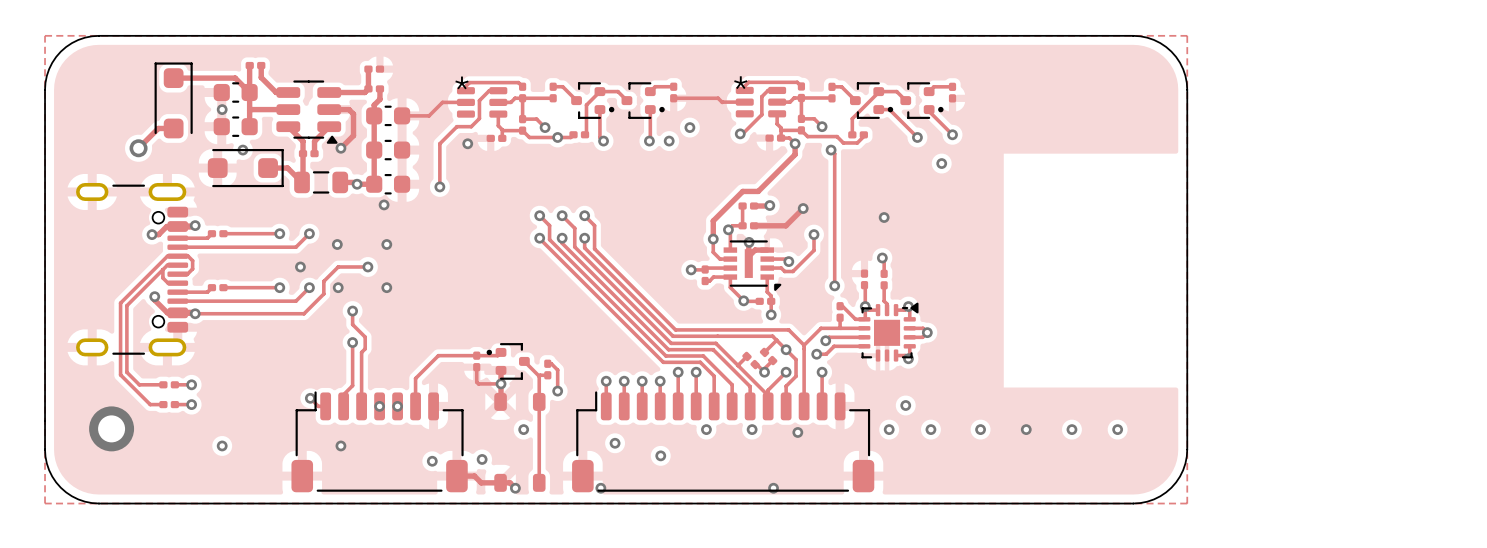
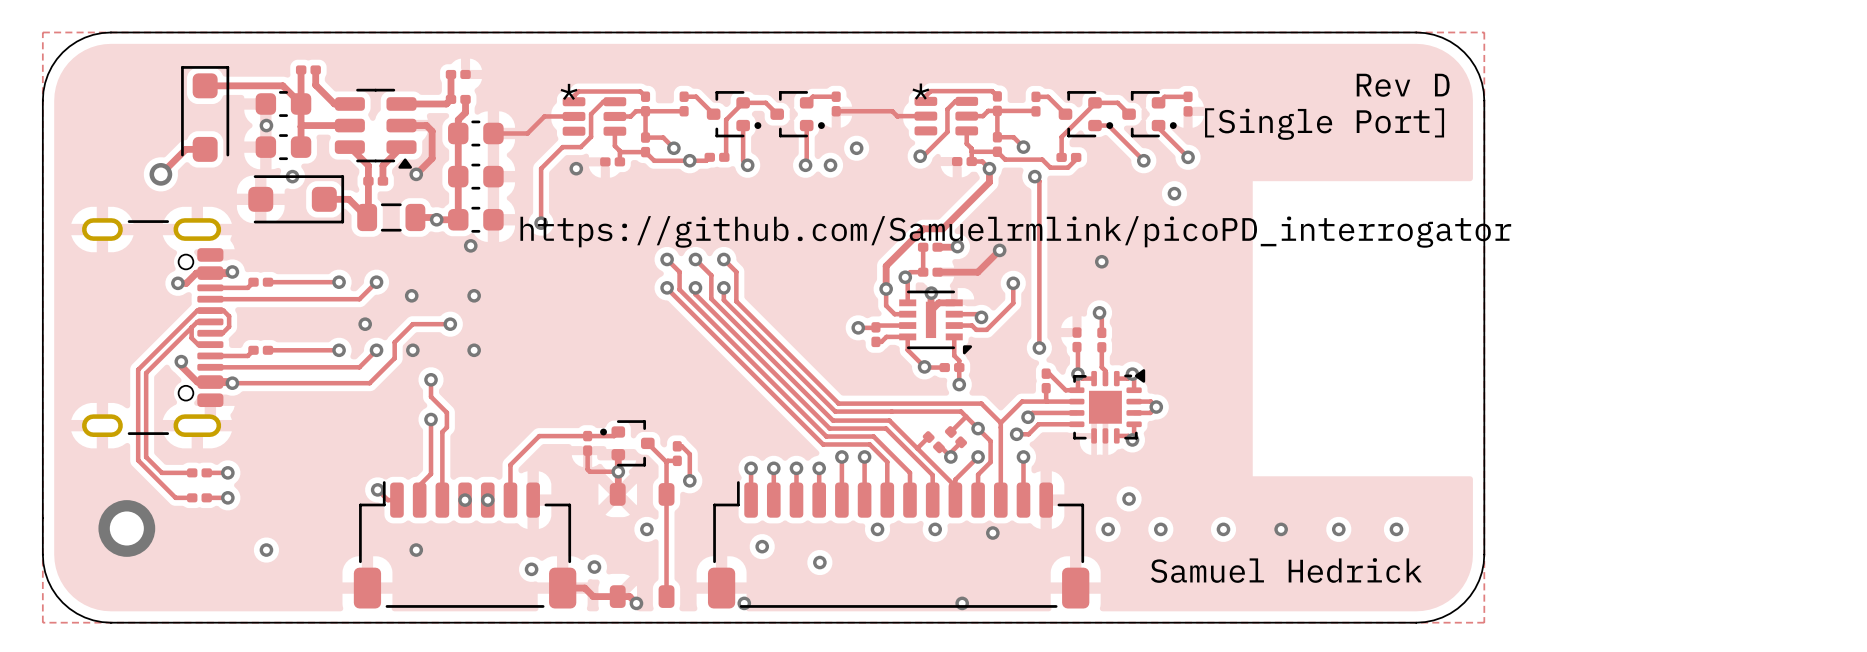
text: none -> Rev D (1403, 85)
text: none -> [Single Port] (1324, 124)
text: none -> https://github.com/Samuelrmlink/picoPD_interrogator (1015, 231)
text: none -> Samuel Hedrick (1286, 570)

